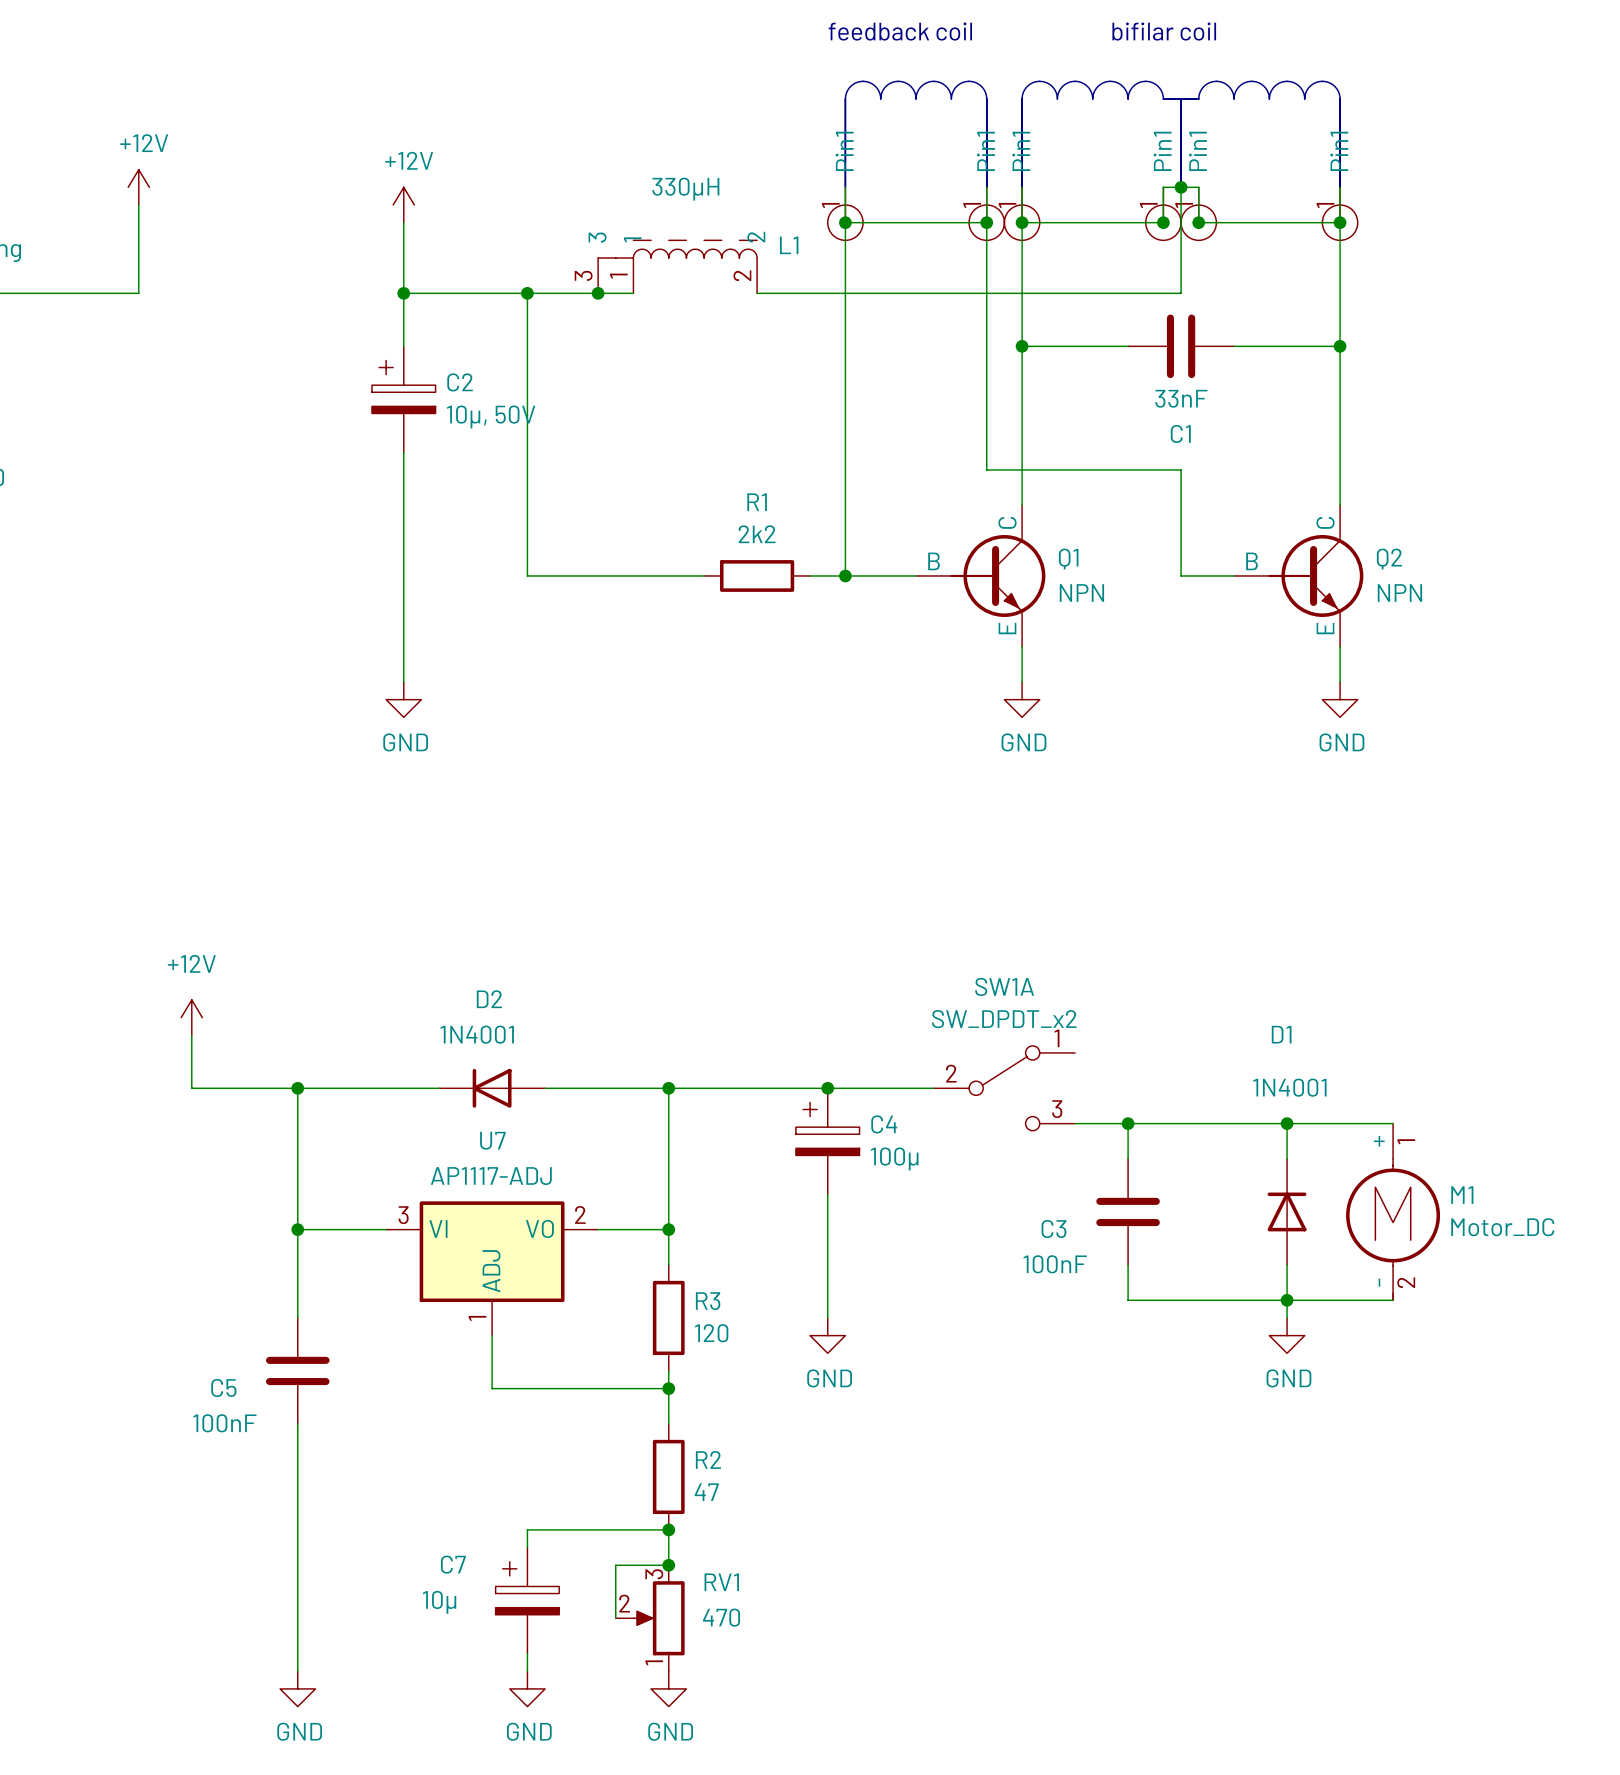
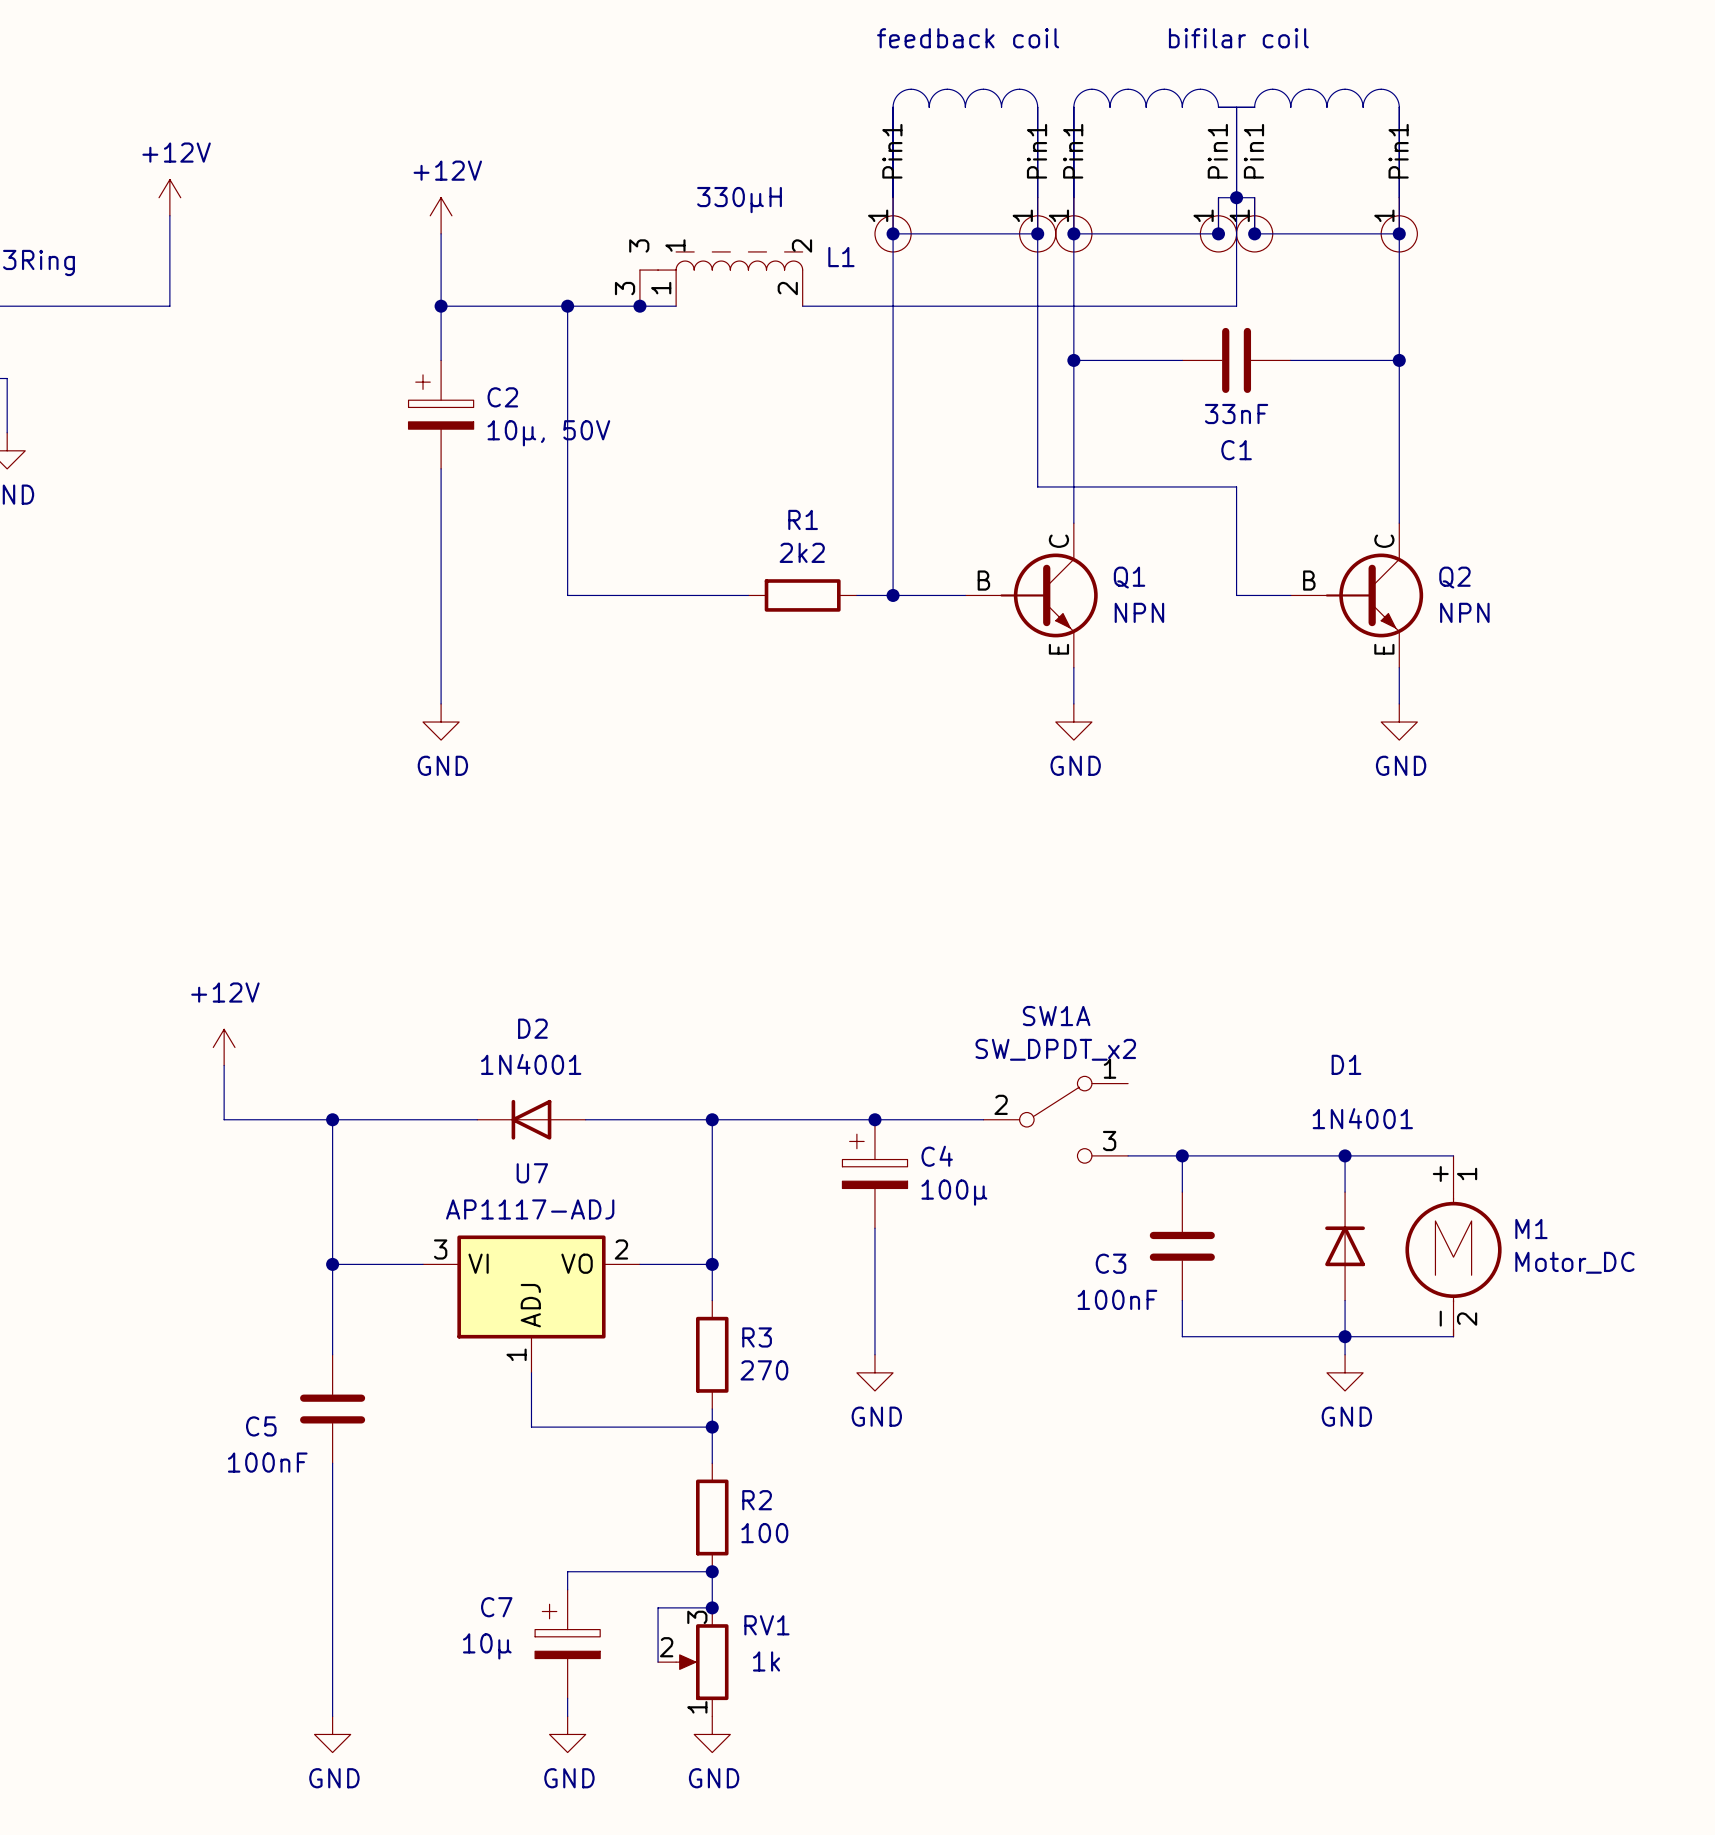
R3 value: 120 (711, 1333) -> 270 (764, 1370)
R2 value: 47 (706, 1492) -> 100 (764, 1533)
RV1 value: 470 (721, 1617) -> 1k (766, 1661)

